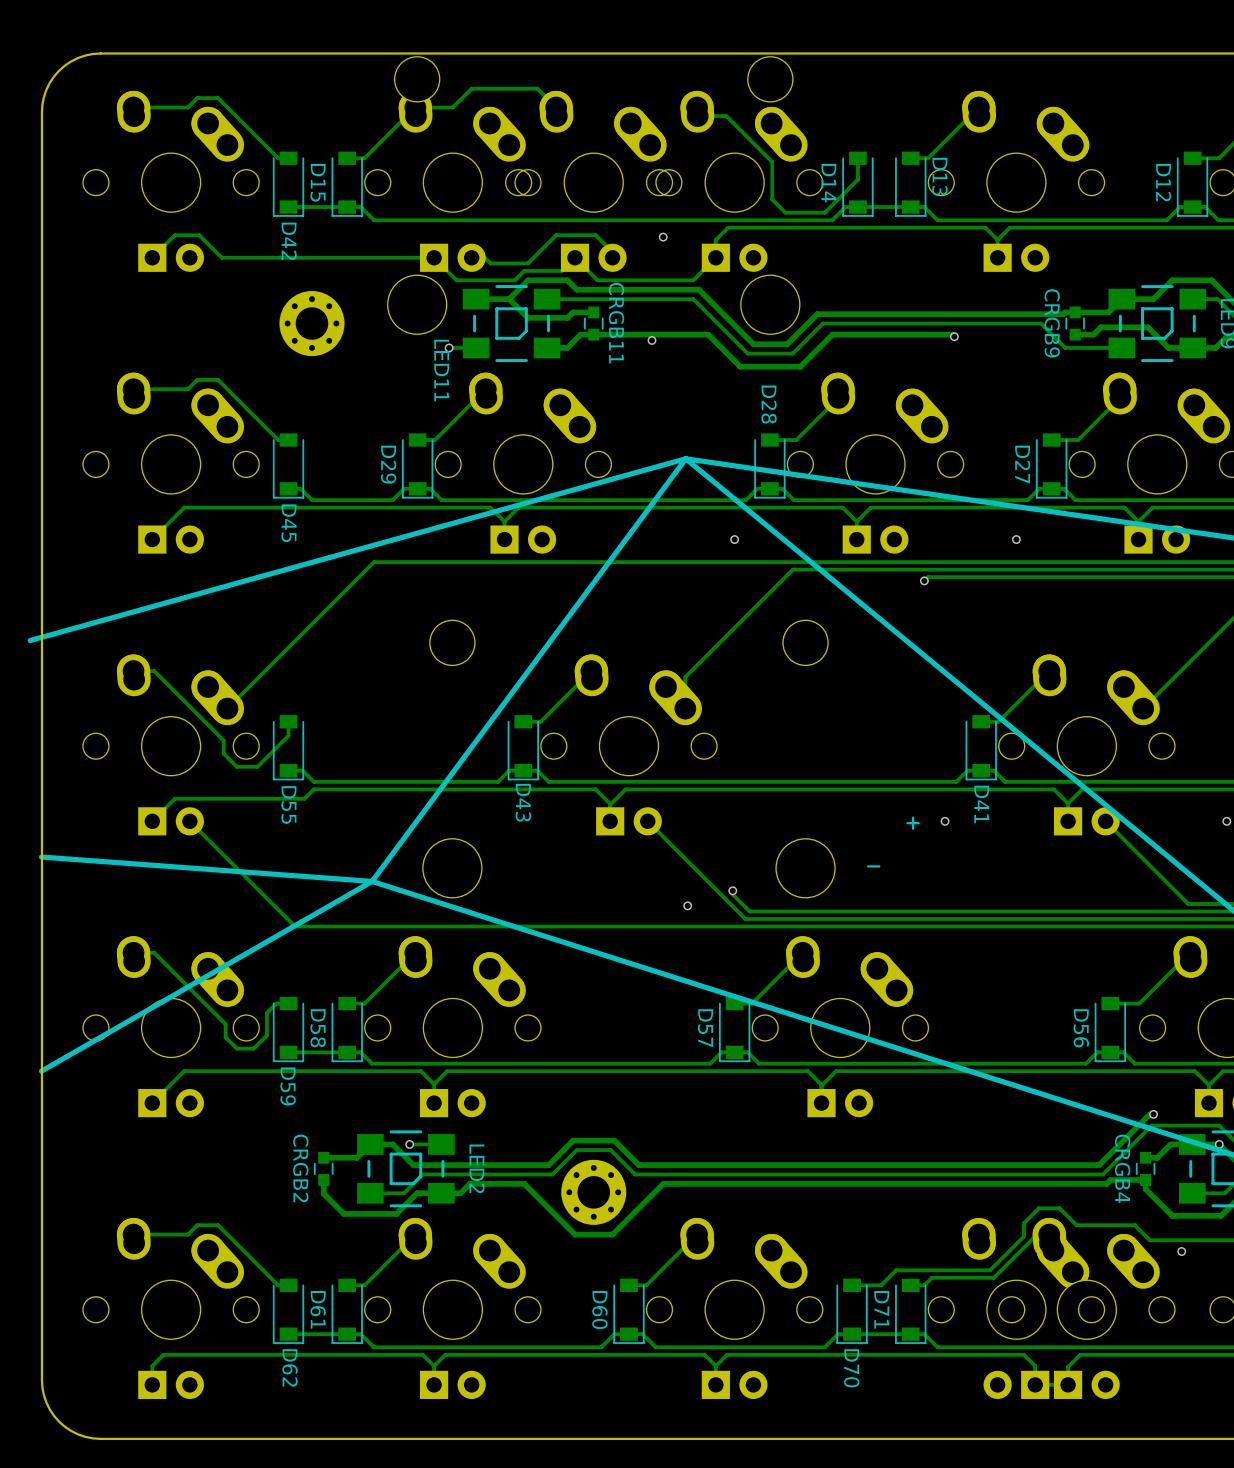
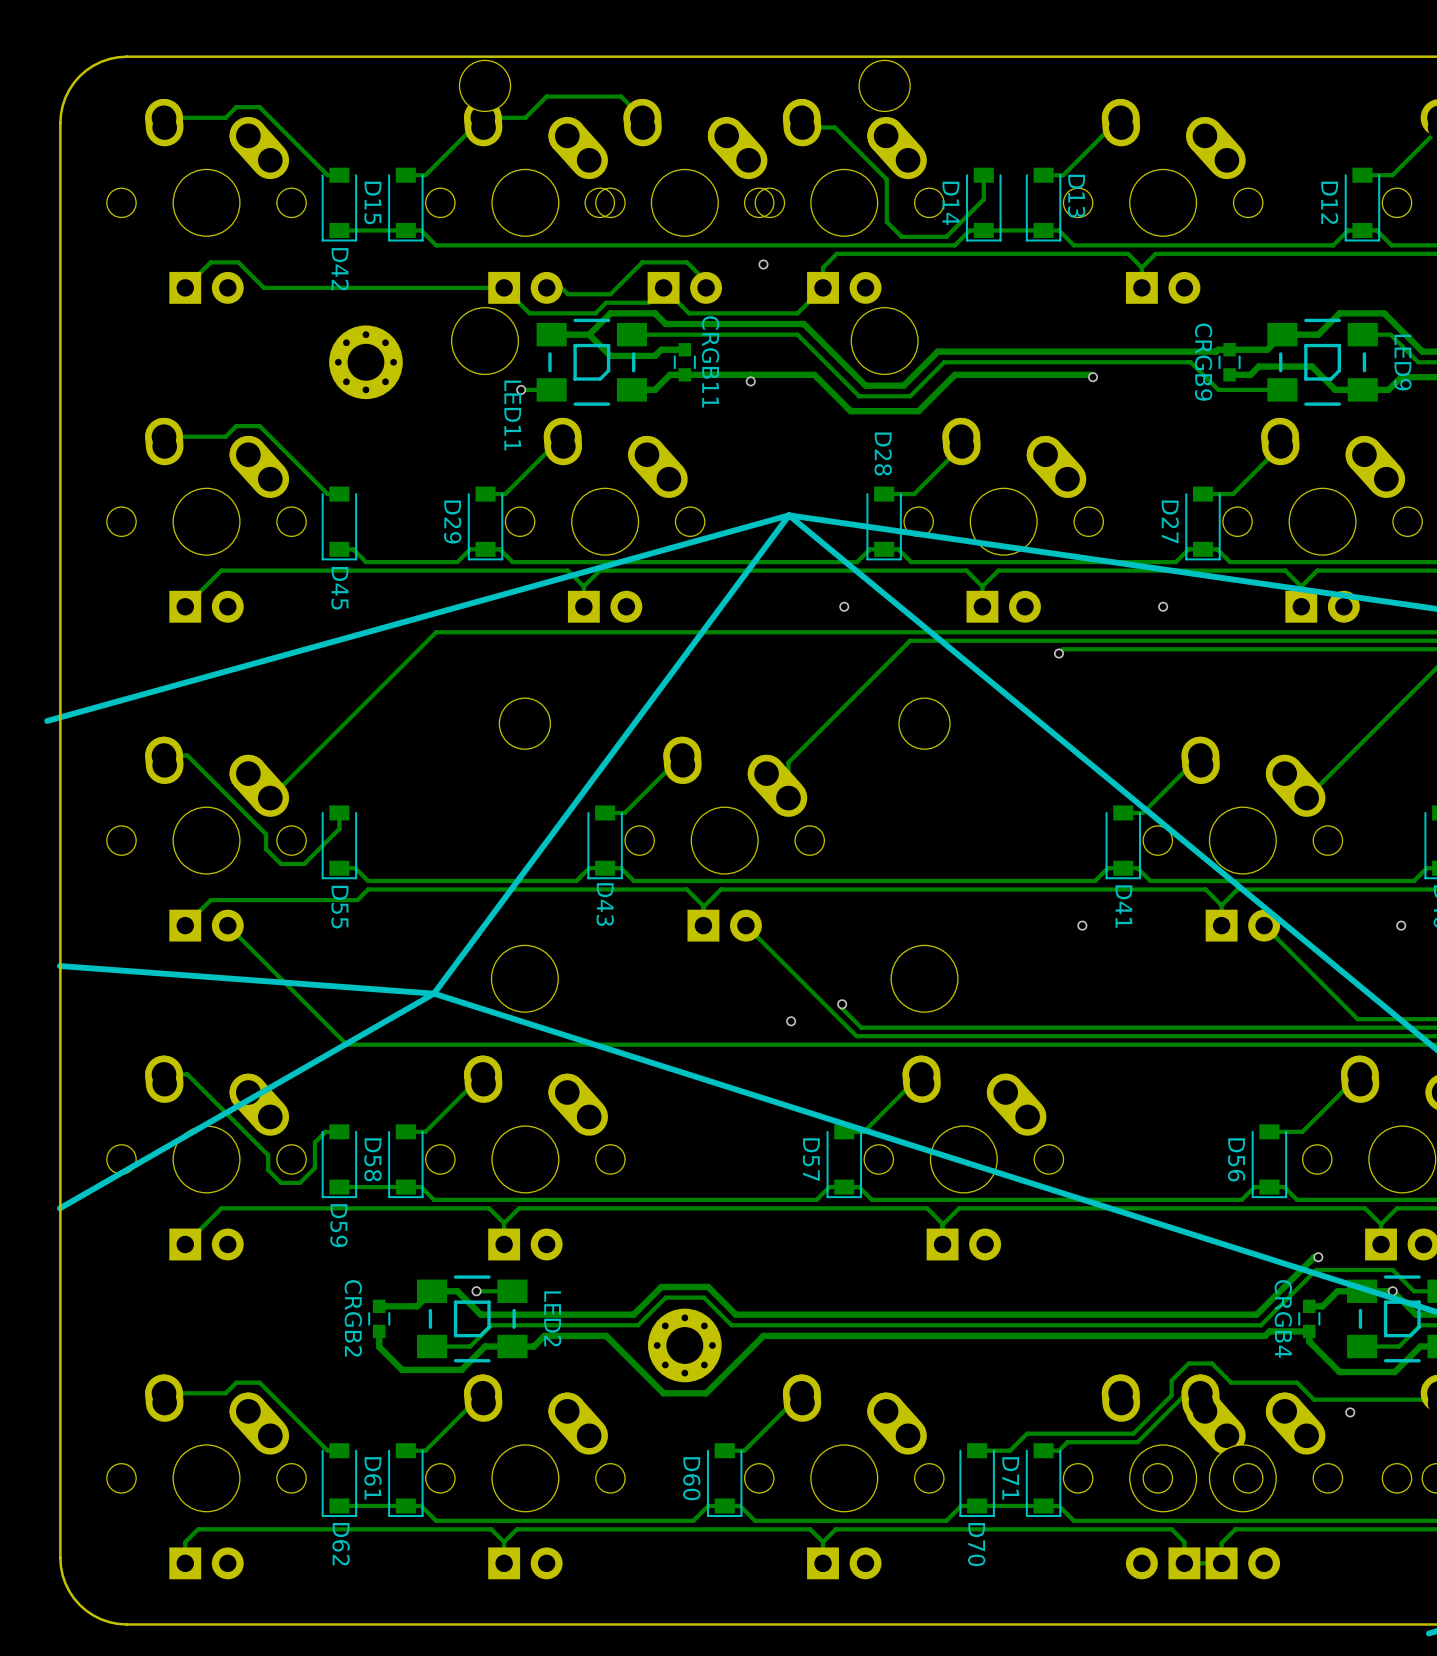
line: (913, 817) (913, 828) -> none
line: (918, 823) (907, 823) -> none
line: (879, 866) (868, 866) -> none

